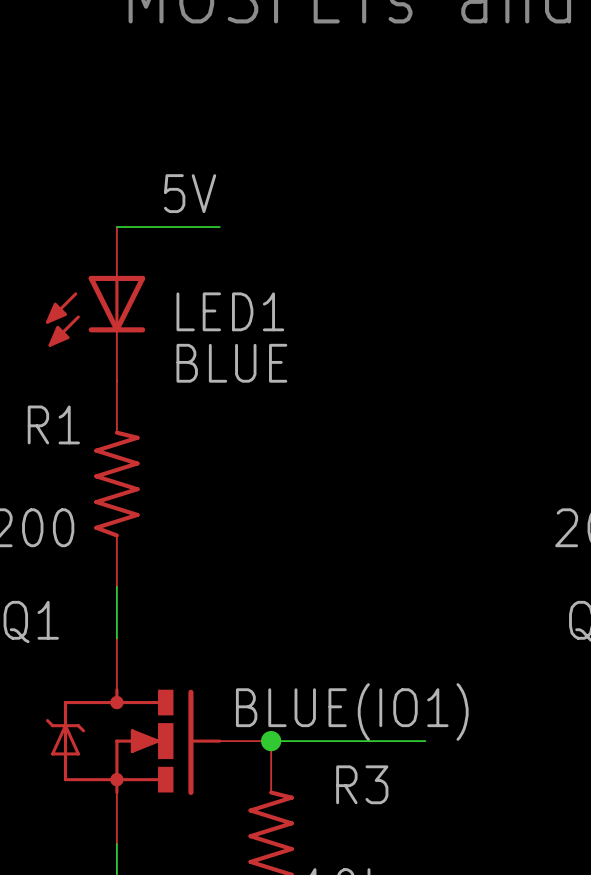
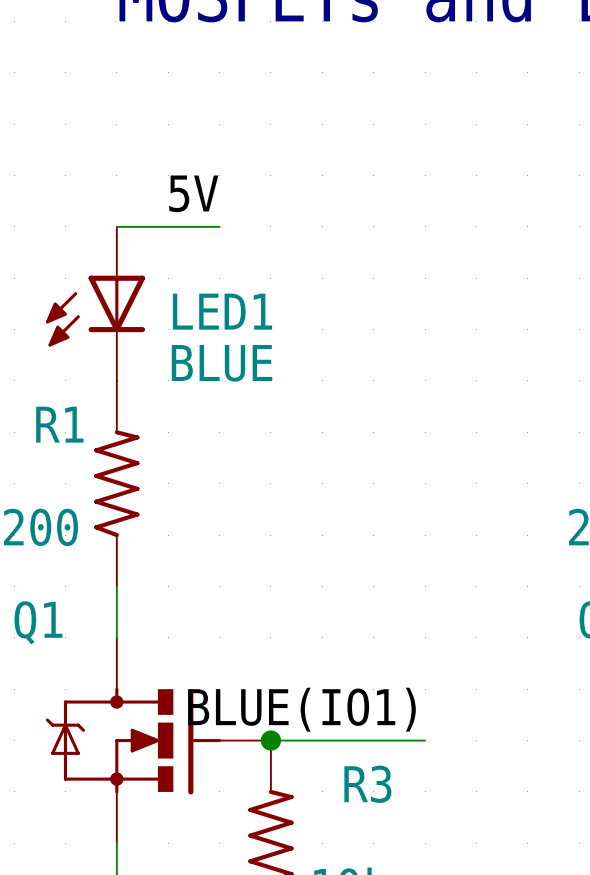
label position: BLUE(IO1) (352, 711) -> BLUE(IO1) (301, 709)

